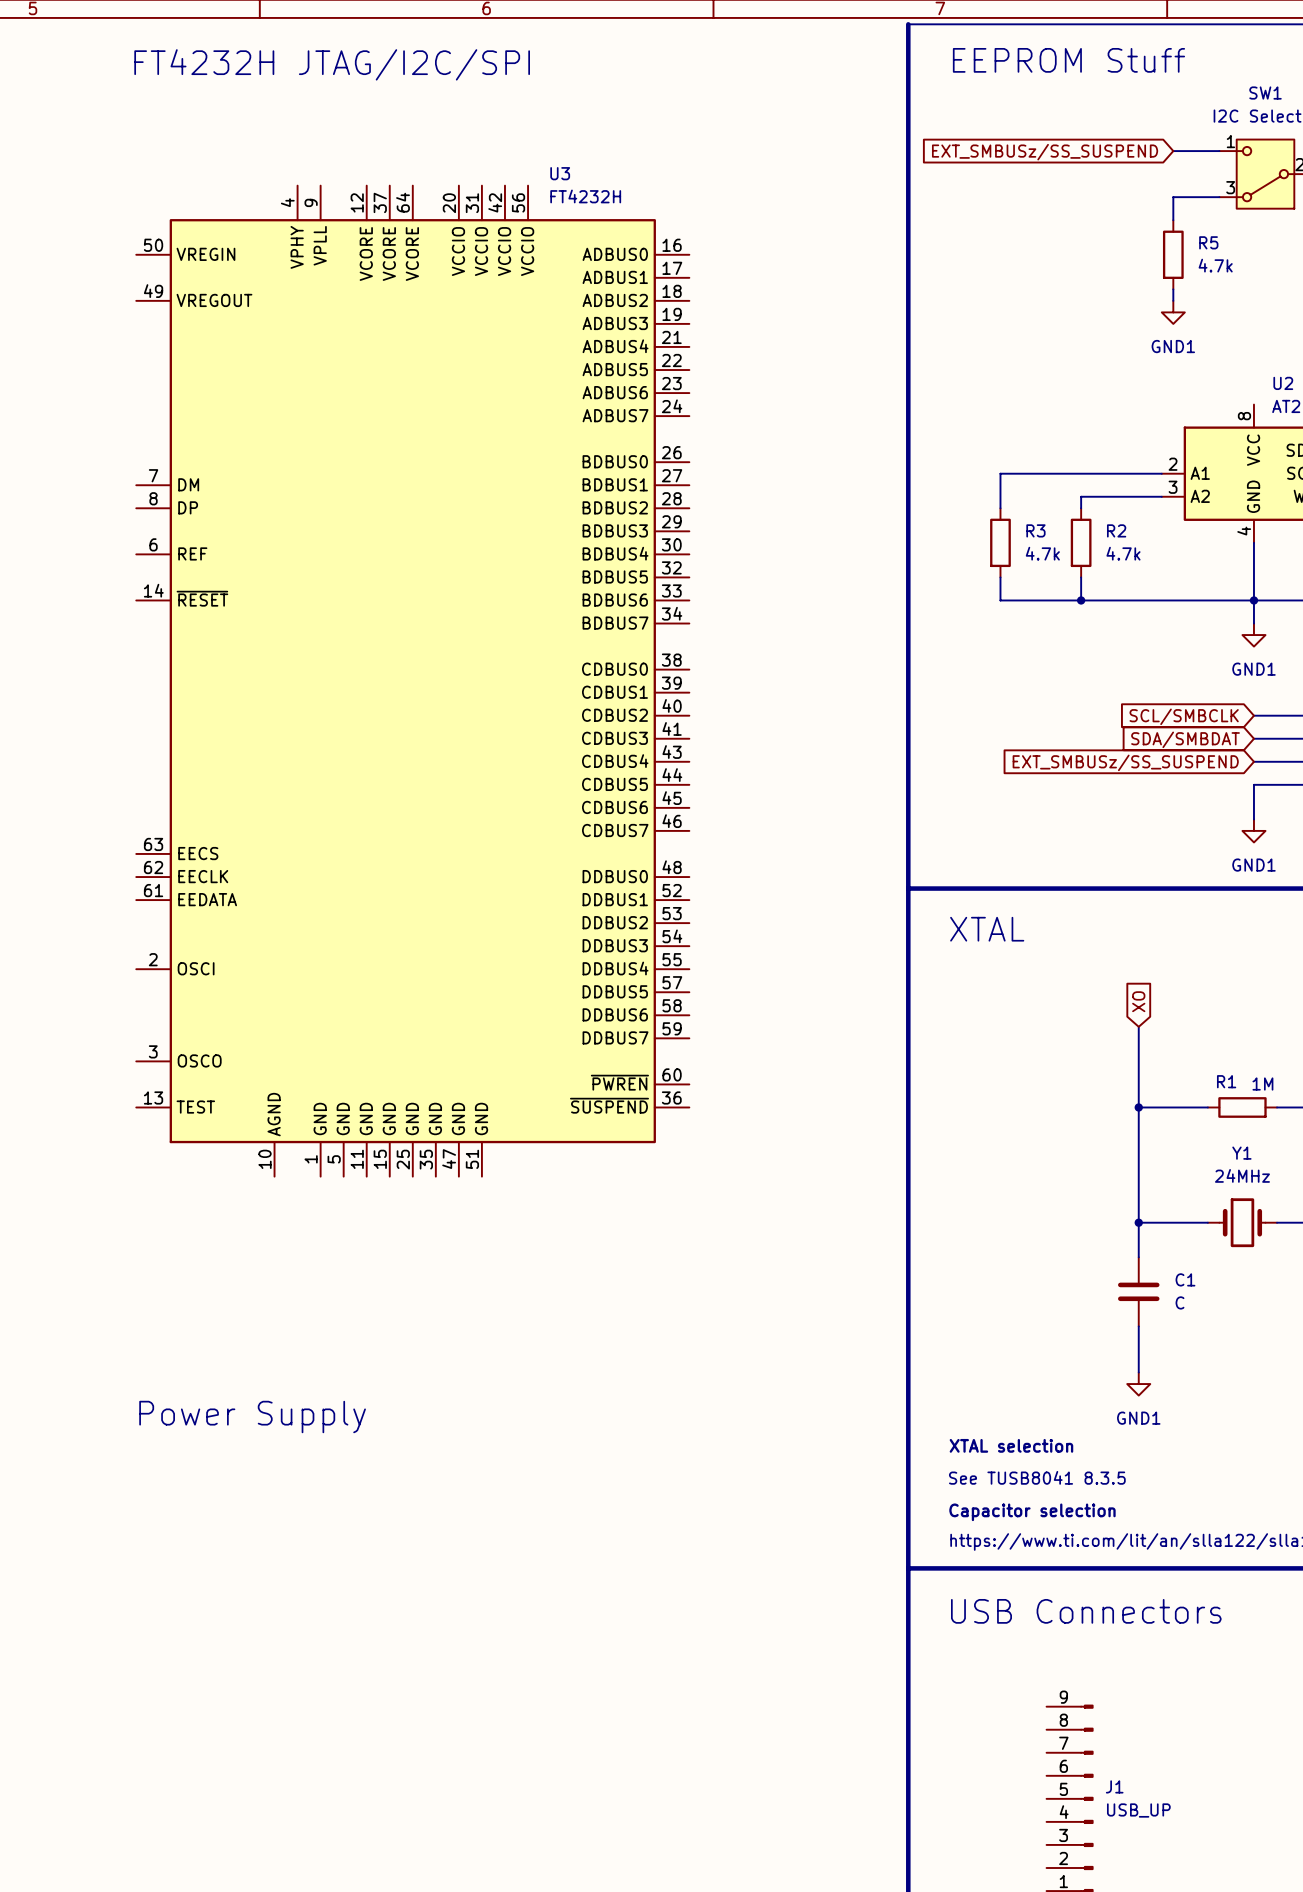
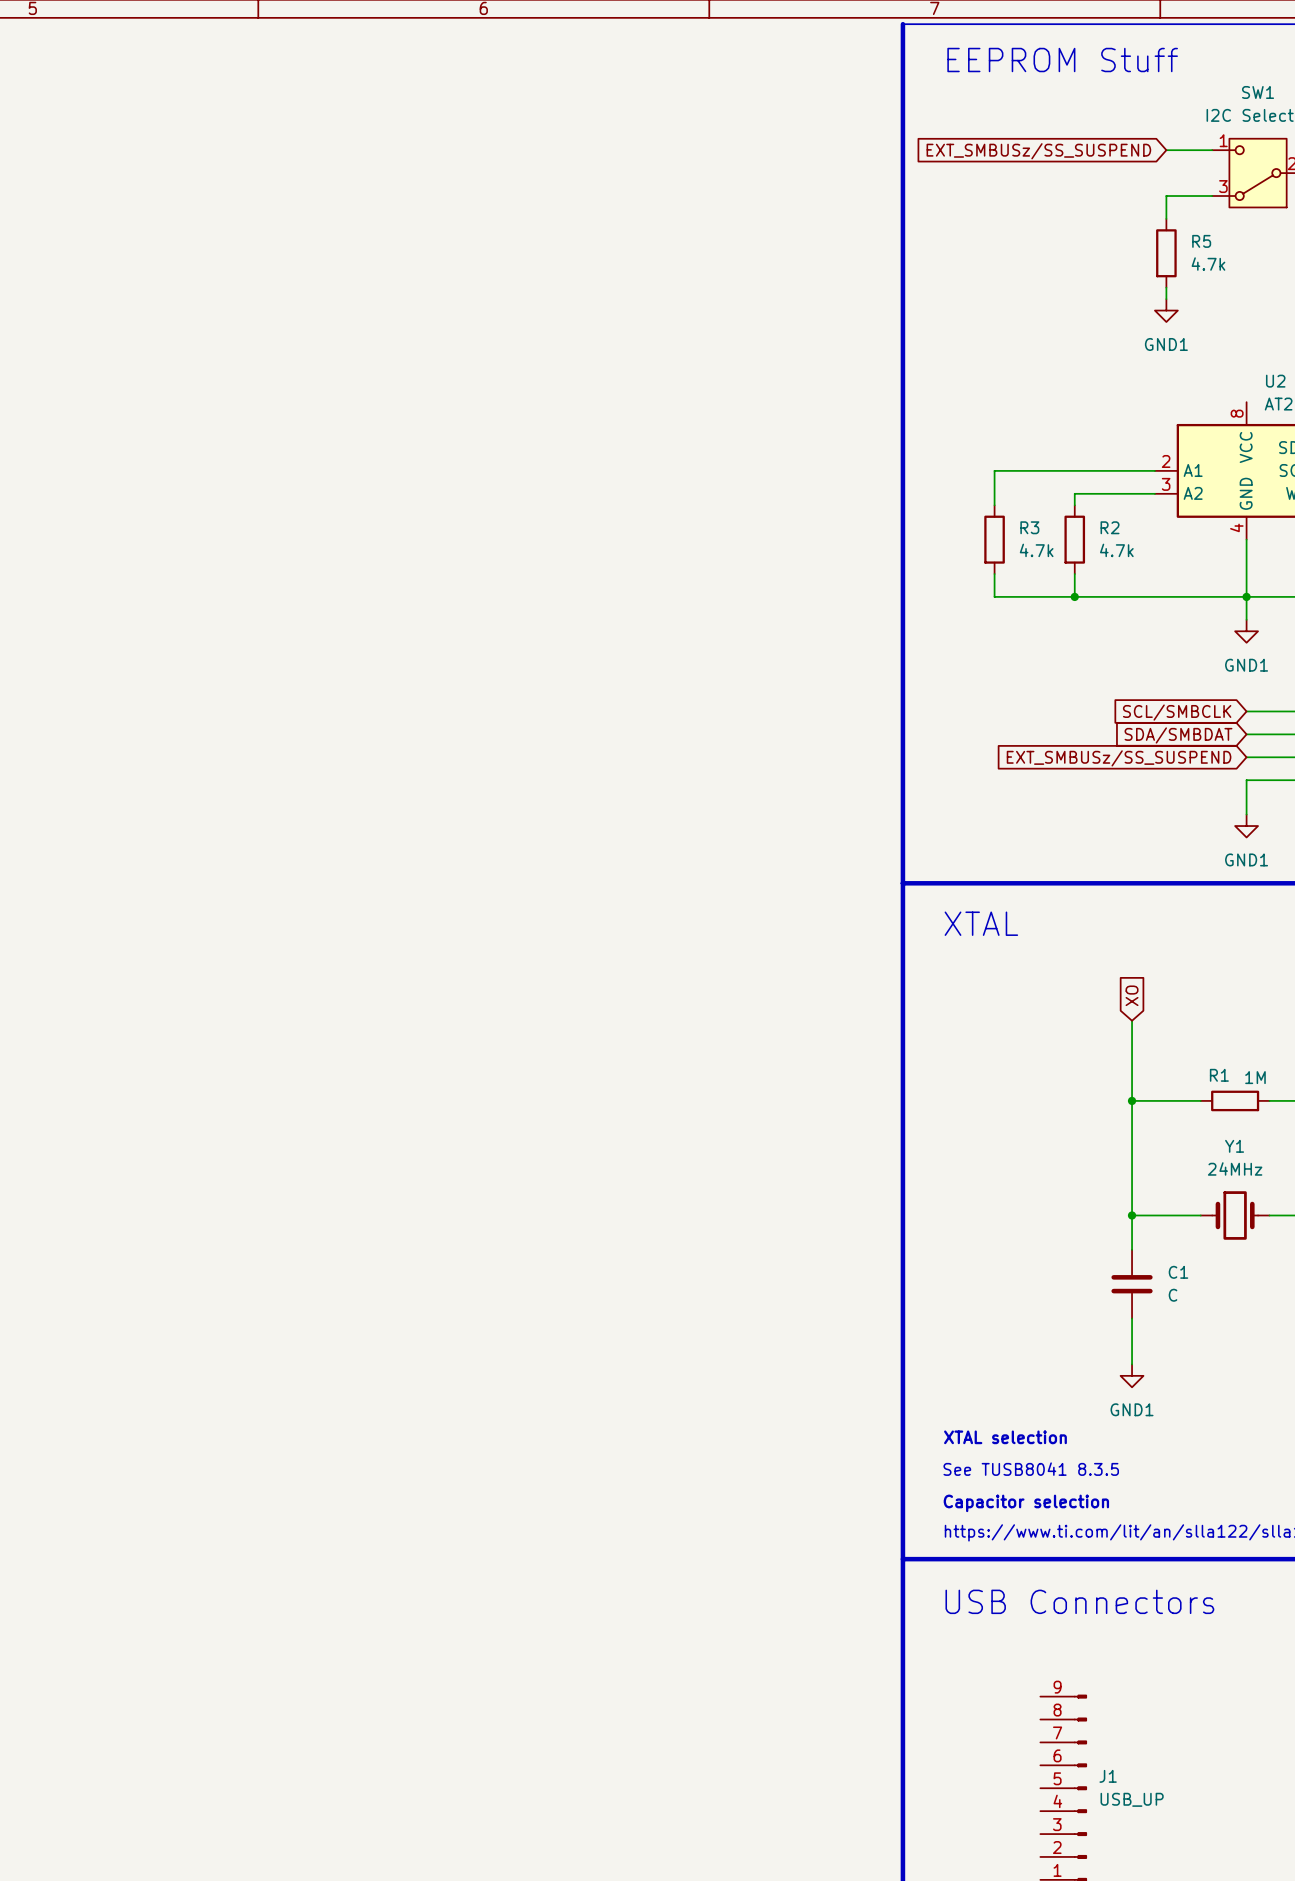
text: FT4232H JTAG/I2C/SPI (332, 64) -> none
U3: FT4232H (412, 681) -> none
text: Power Supply (252, 1417) -> none

